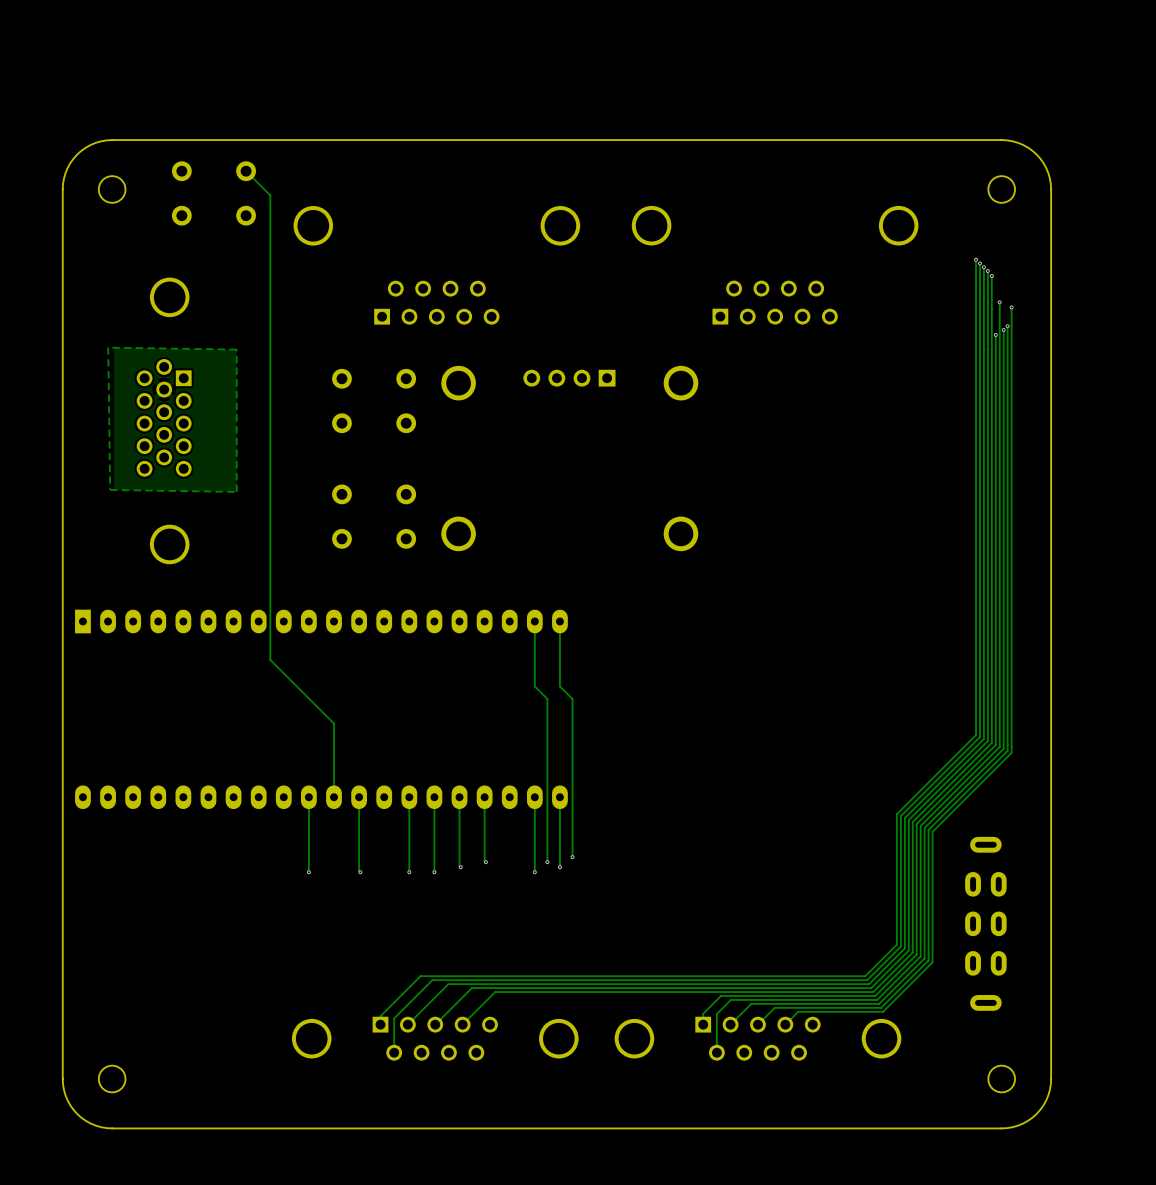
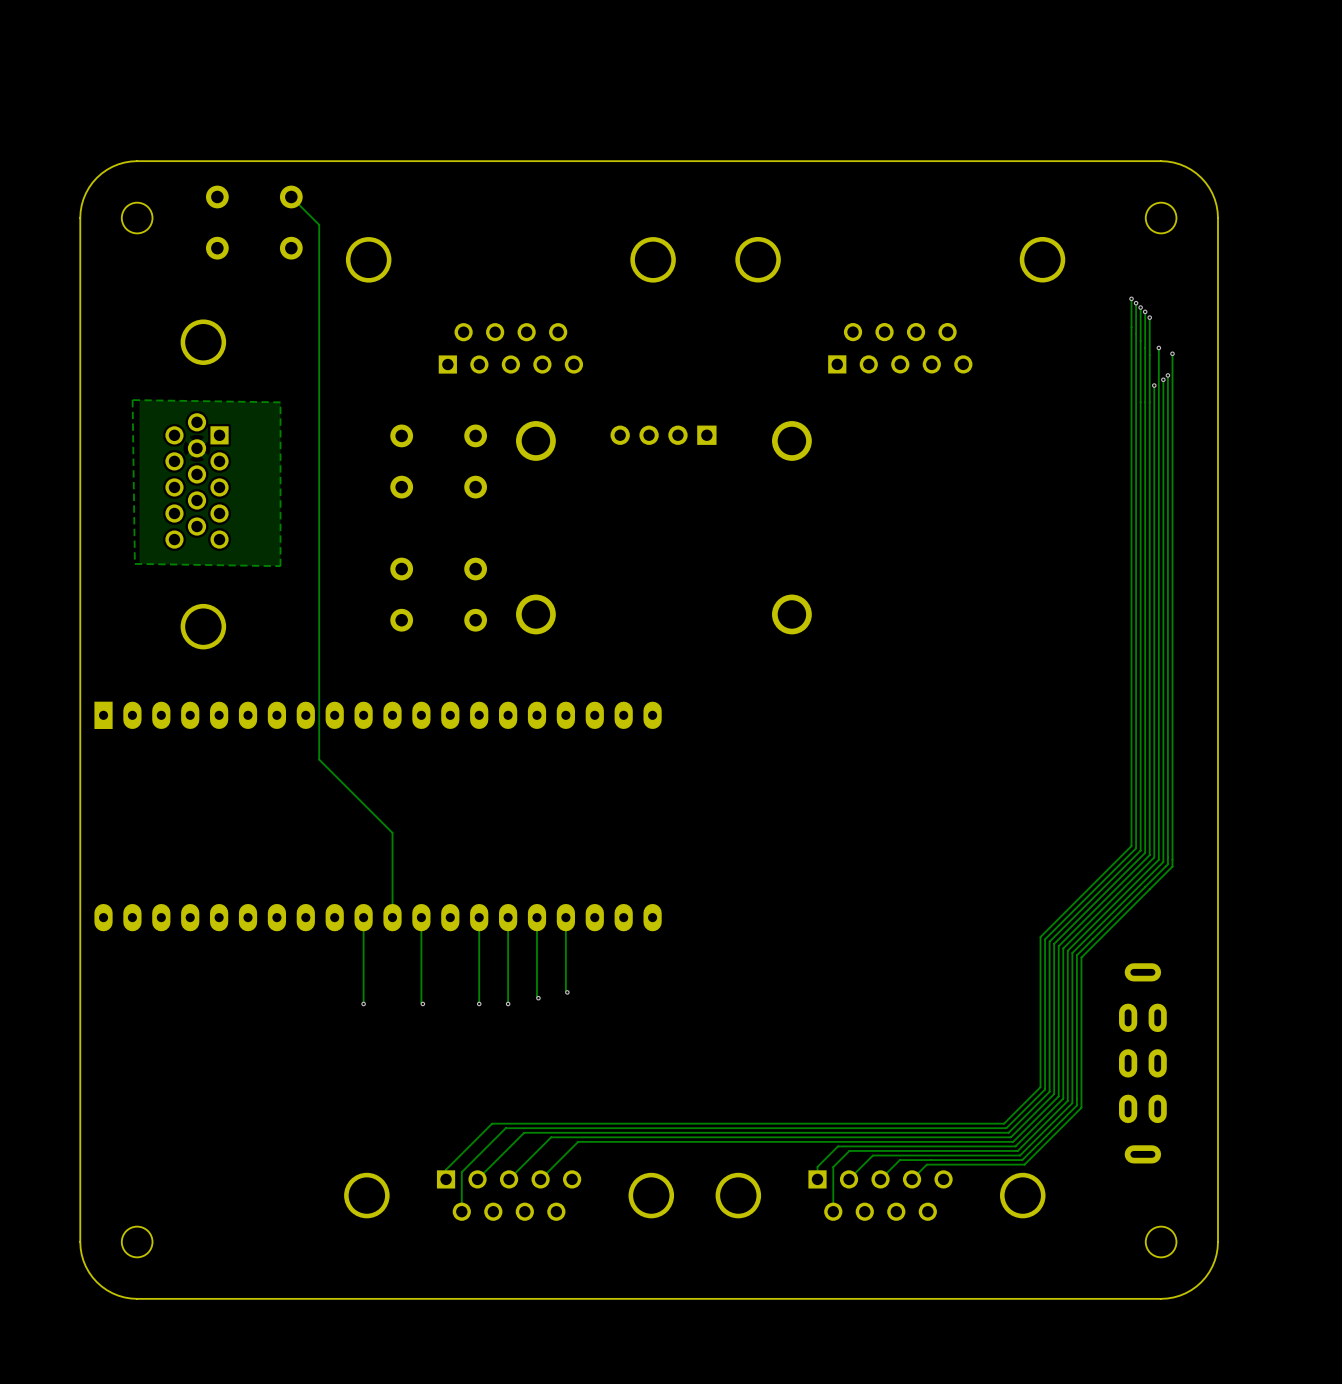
track: (534, 621) (534, 686) (547, 699) (547, 862) -> none
track: (559, 621) (559, 686) (572, 699) (572, 857) -> none
track: (534, 797) (534, 872) -> none
track: (559, 797) (559, 867) -> none
via: (572, 857) -> none
via: (547, 862) -> none
via: (559, 867) -> none
via: (534, 872) -> none

